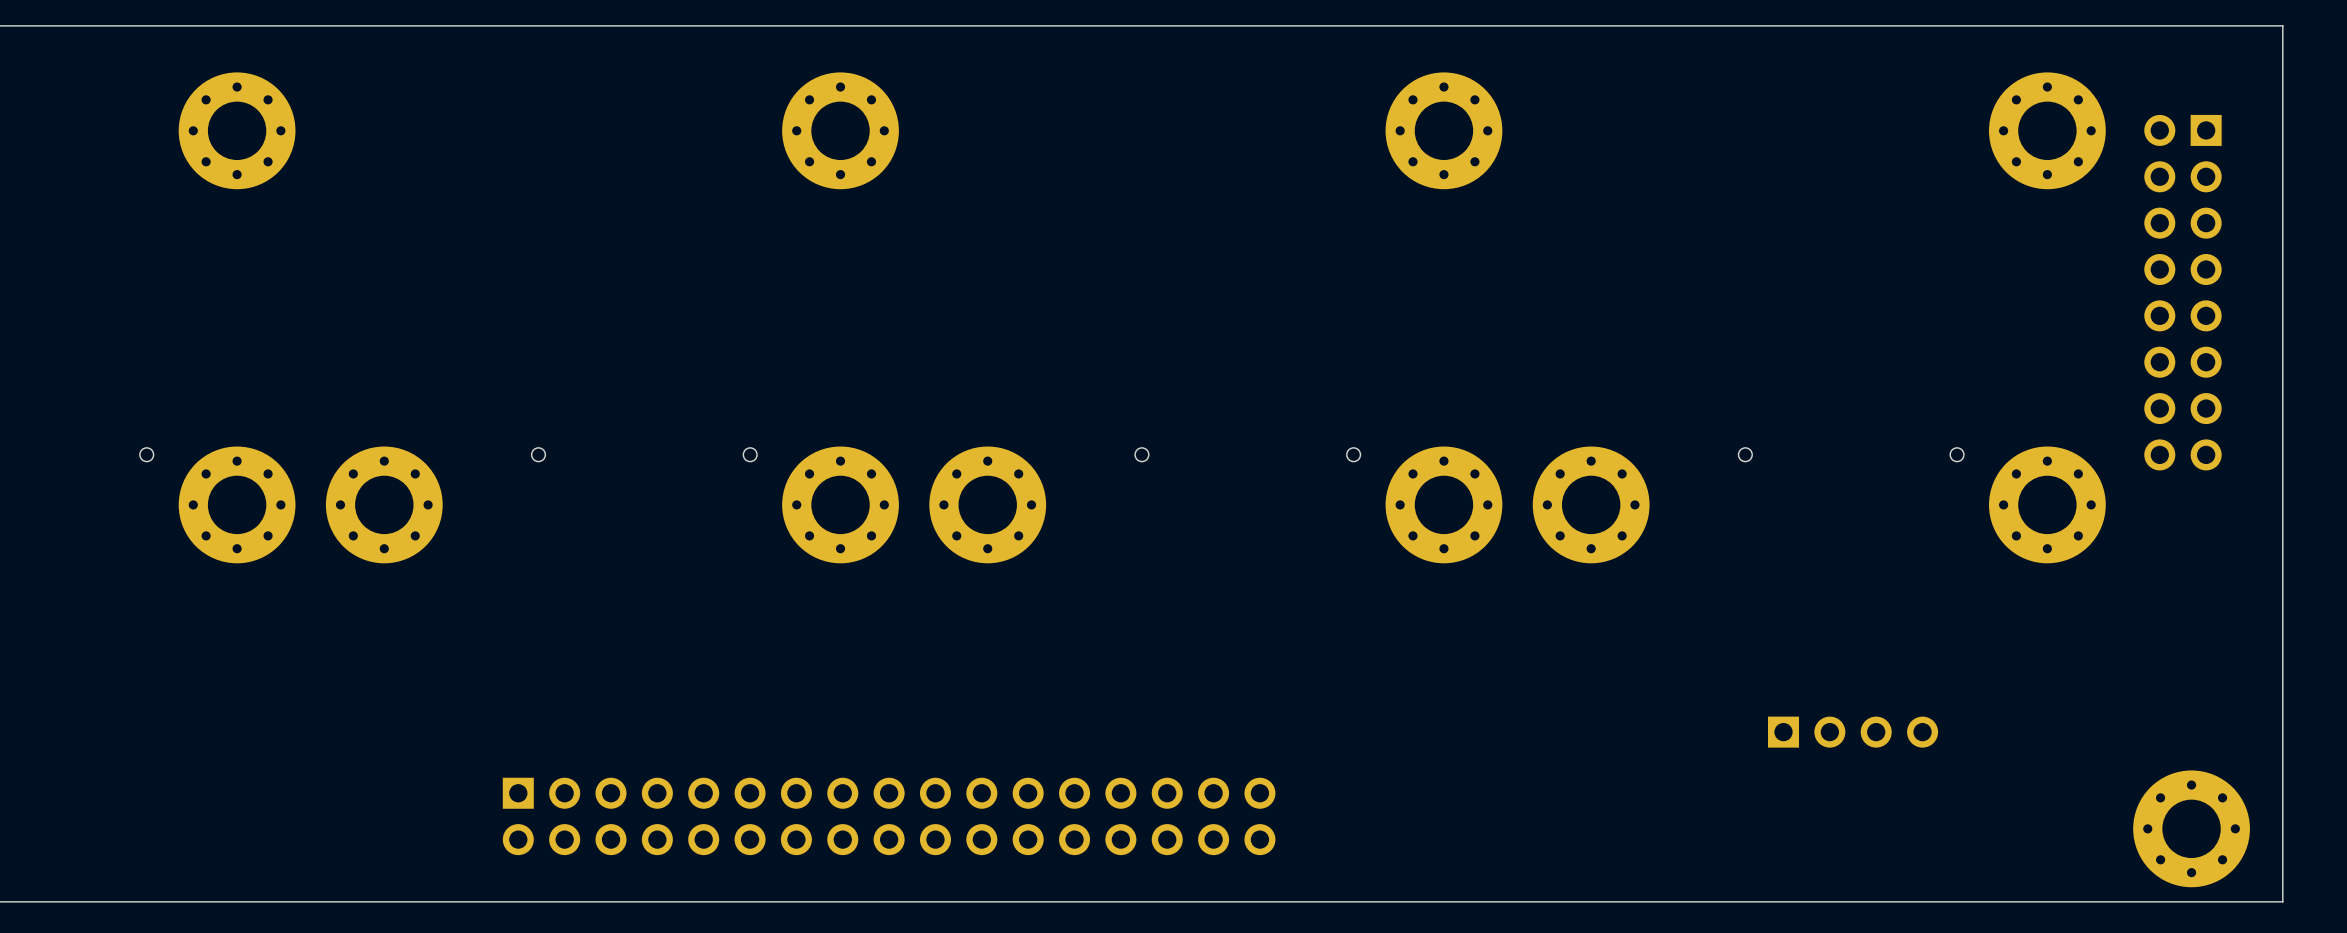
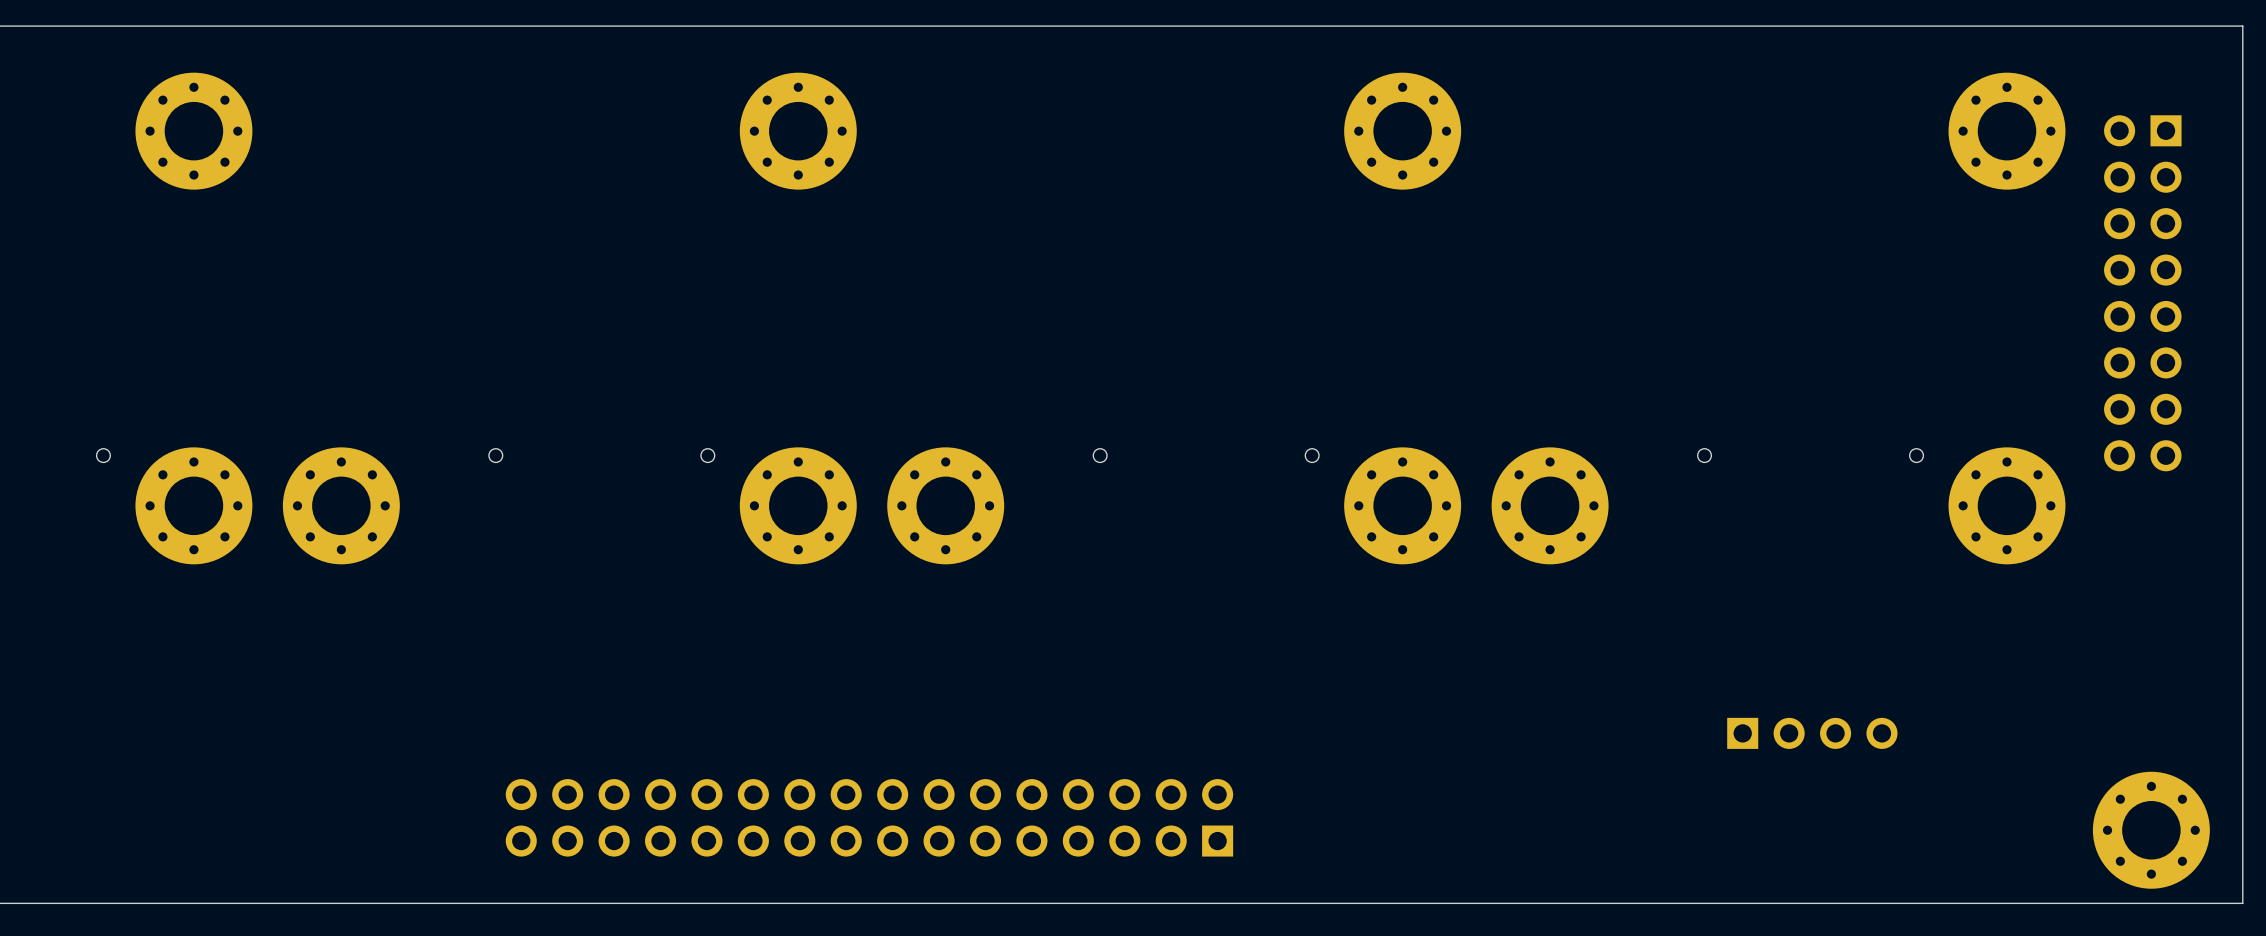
part: (889, 816) -> none
part: none -> (869, 817)

